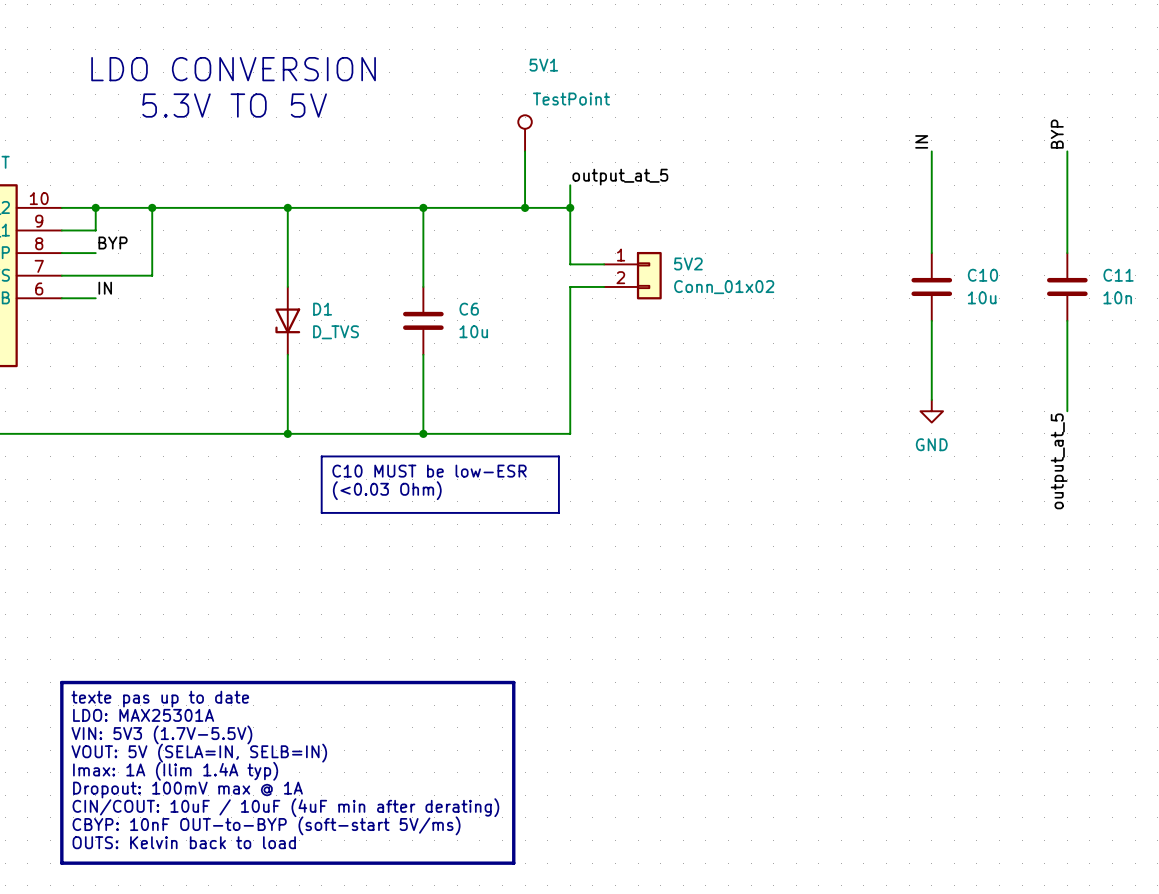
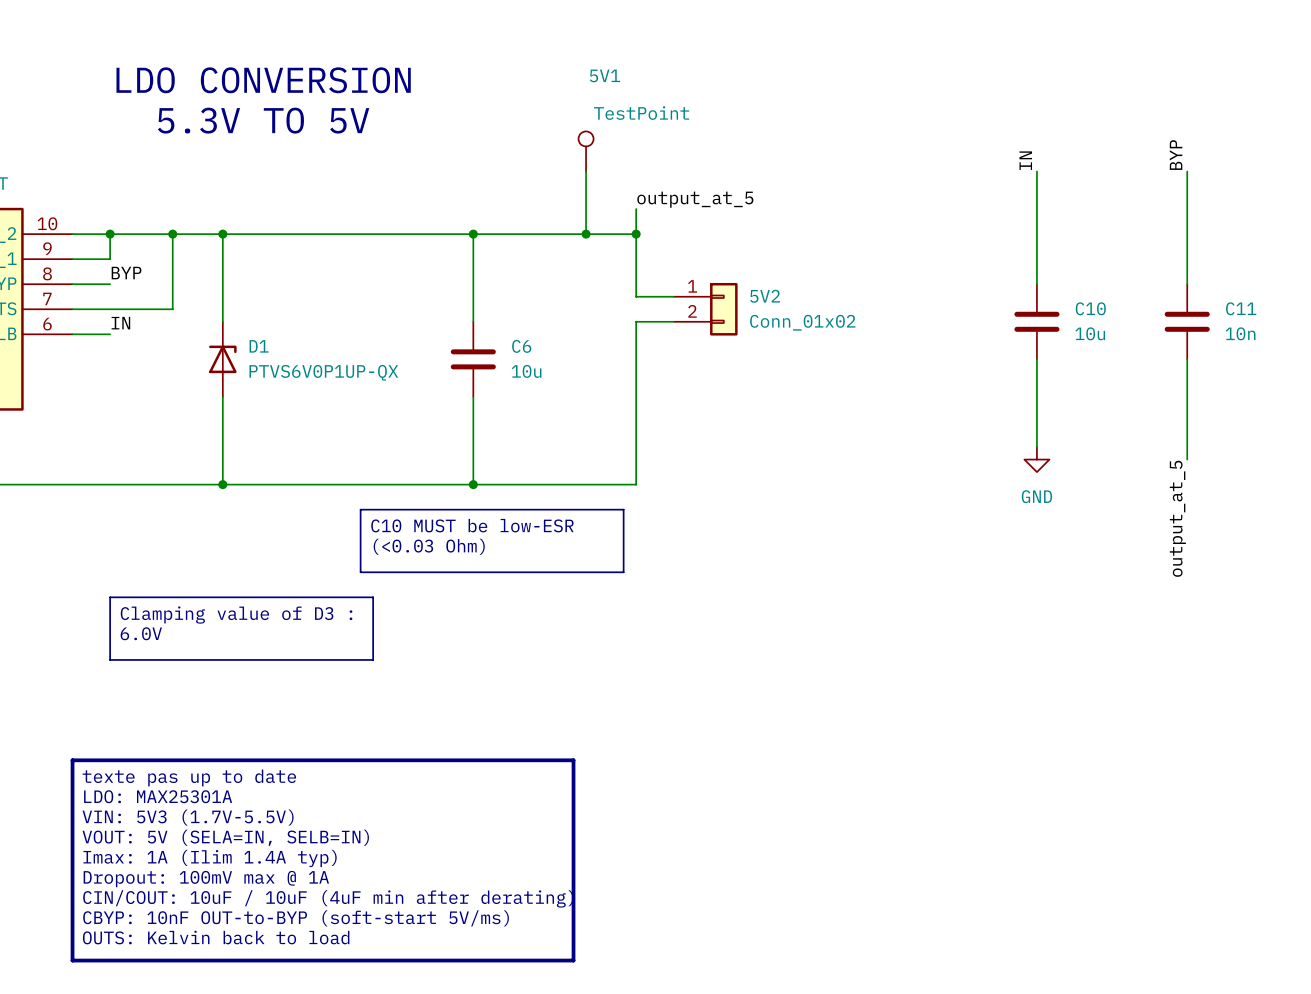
junction: none -> (222, 234)
wire: (287, 207) (287, 286) -> (222, 234) (222, 321)
junction: (287, 207) -> none
D1 rotation: 0° (287, 320) -> 180° (222, 359)
D1 position: (287, 320) -> (222, 359)
D1 value: D_TVS (336, 332) -> PTVS6V0P1UP-QX (323, 372)
wire: (287, 354) (287, 433) -> (222, 396) (222, 484)
junction: none -> (222, 484)
junction: (287, 433) -> none
line: none -> (110, 597) (373, 597) (373, 659) (110, 659) (110, 597)
text: none -> Clamping value of D3 : (236, 615)
text: none -> 6.0V (141, 633)

